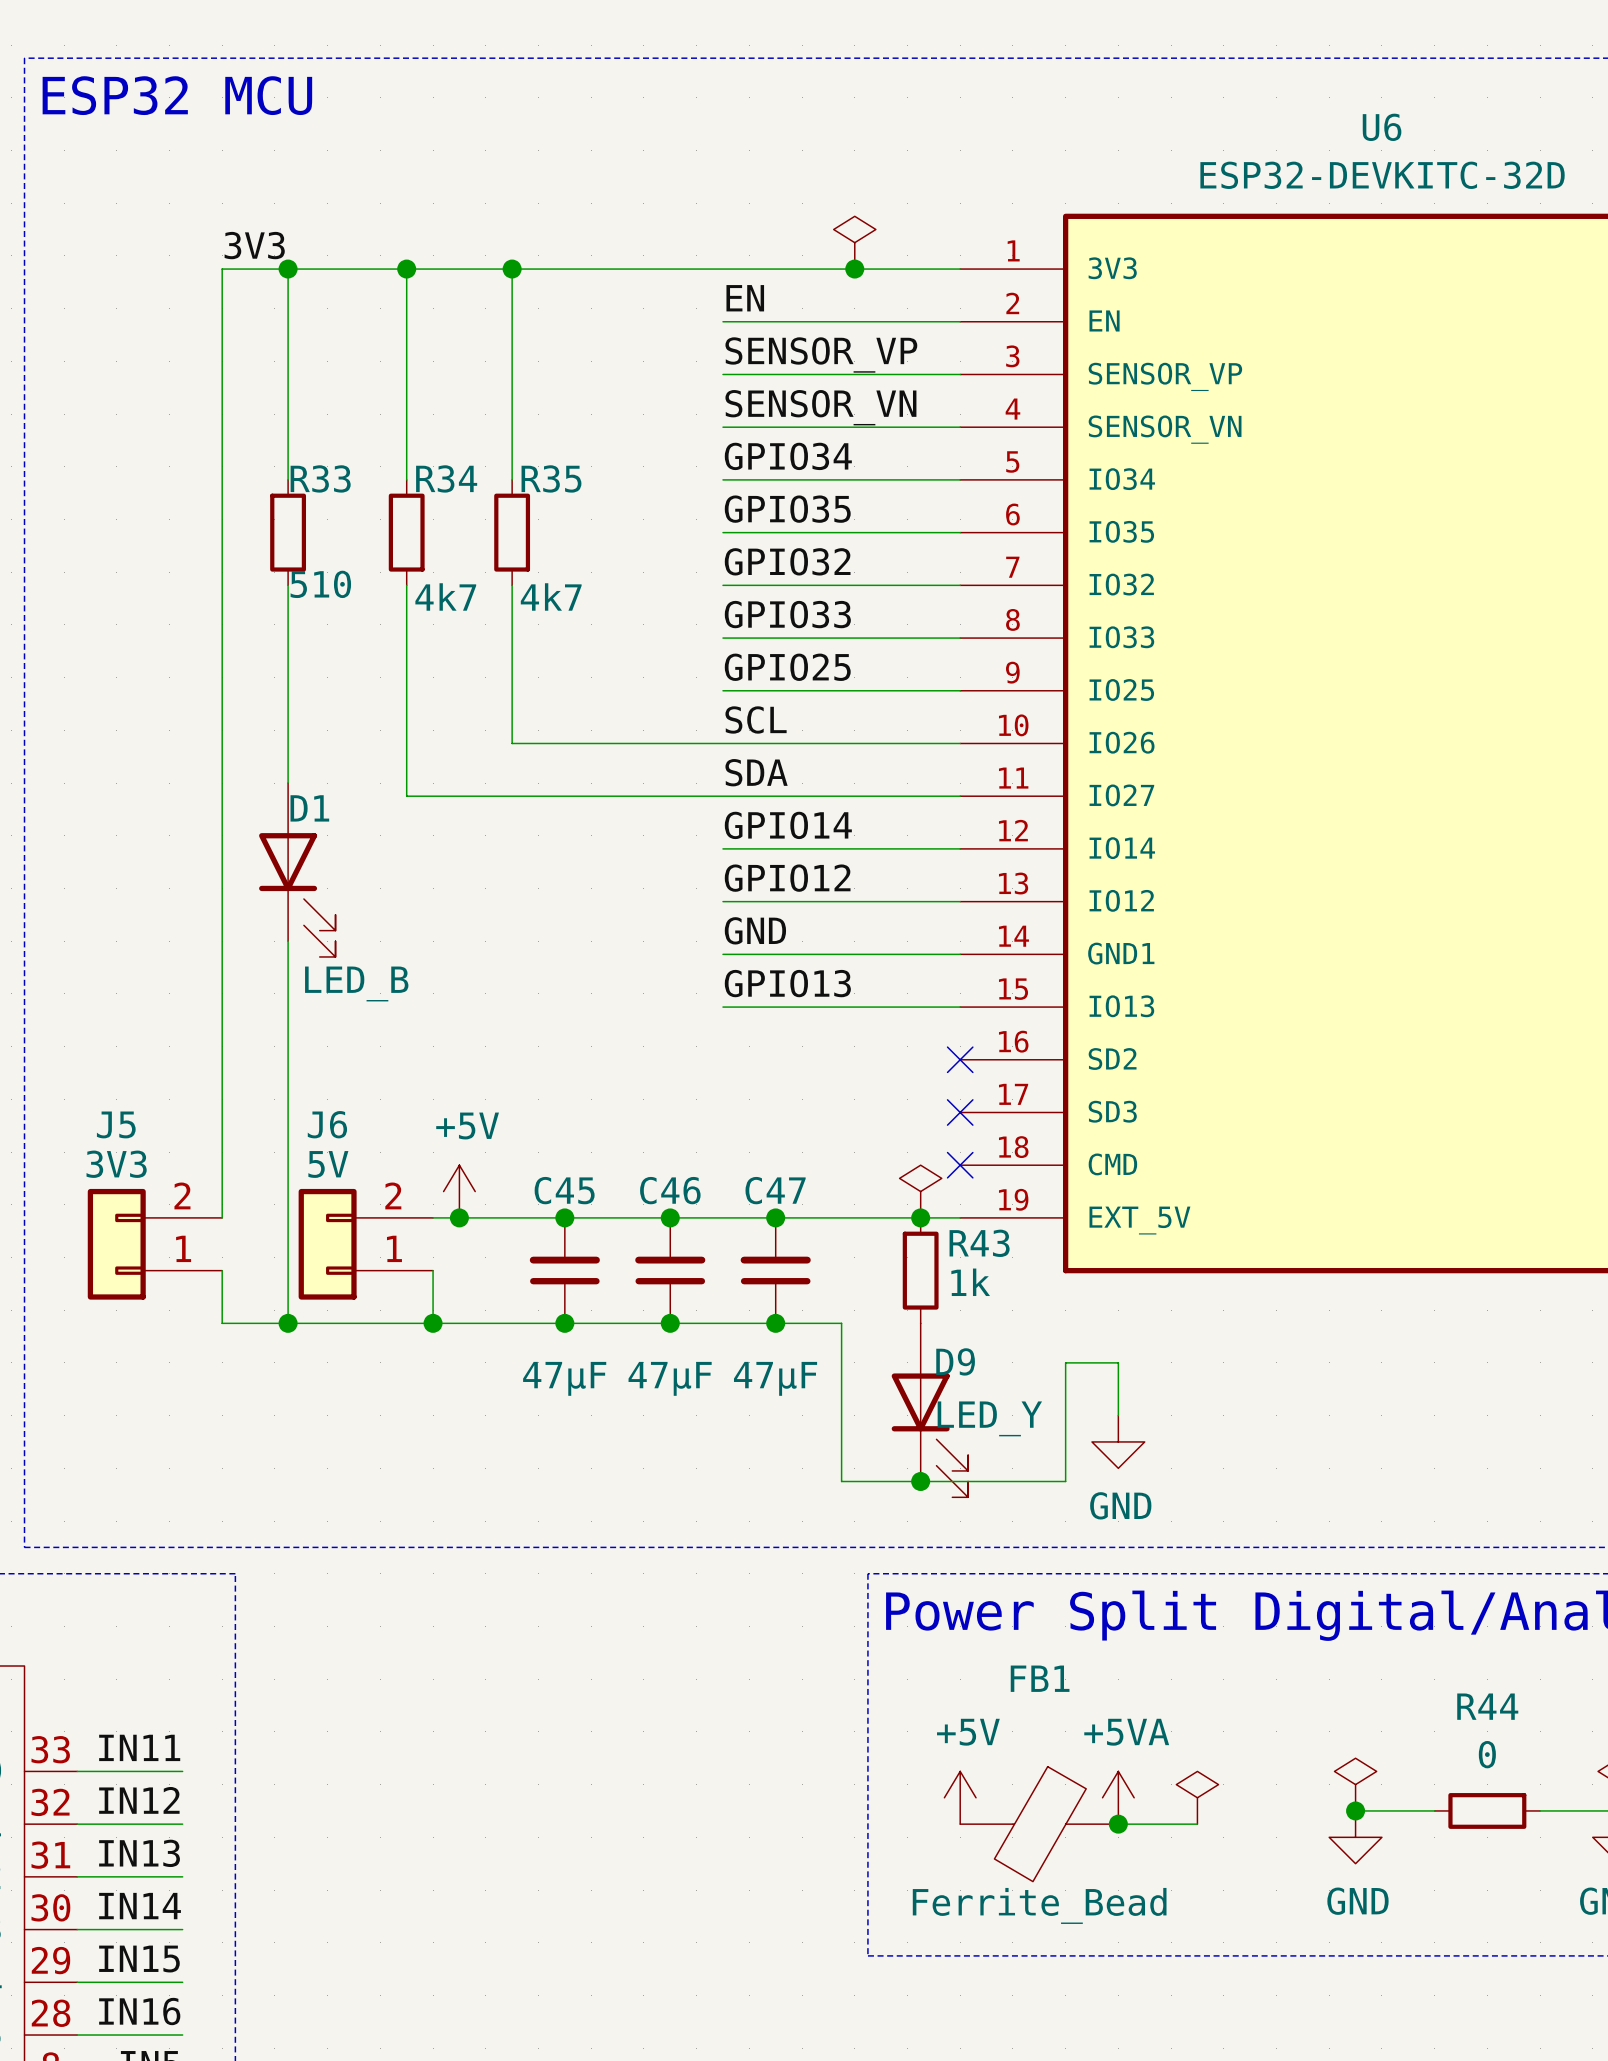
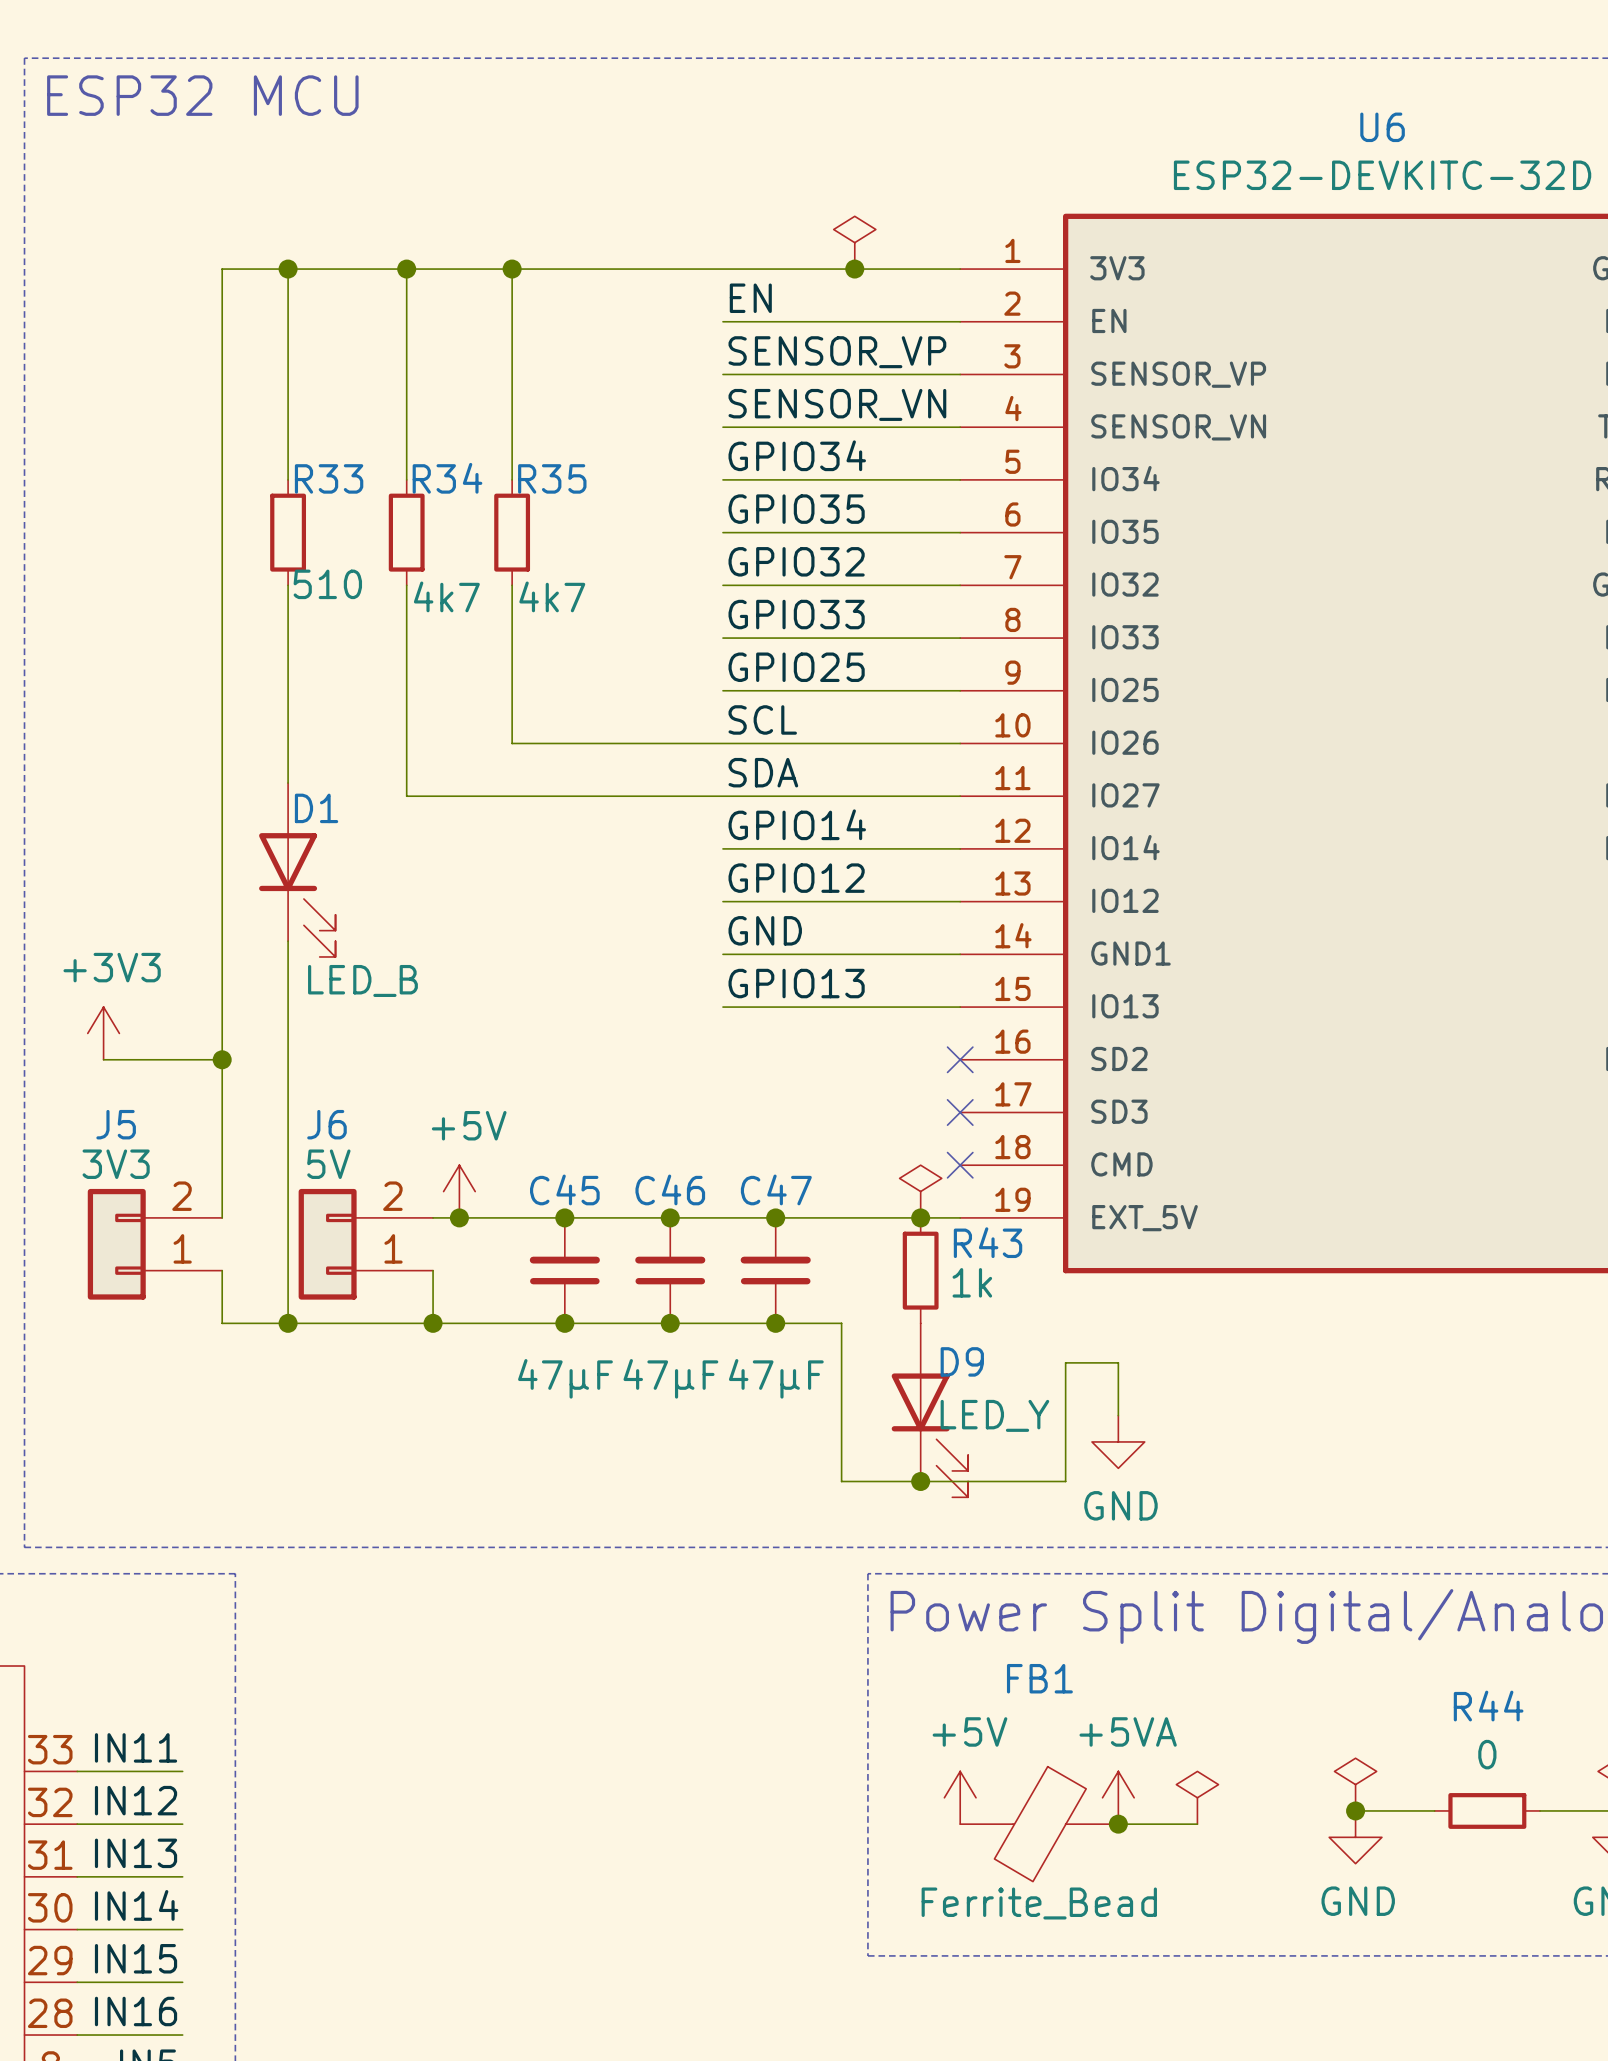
label: 3V3 (254, 245) -> none
power symbol: none -> +3V3 (103, 1033)
wire: none -> (103, 1059) (222, 1059)
junction: none -> (222, 1059)

